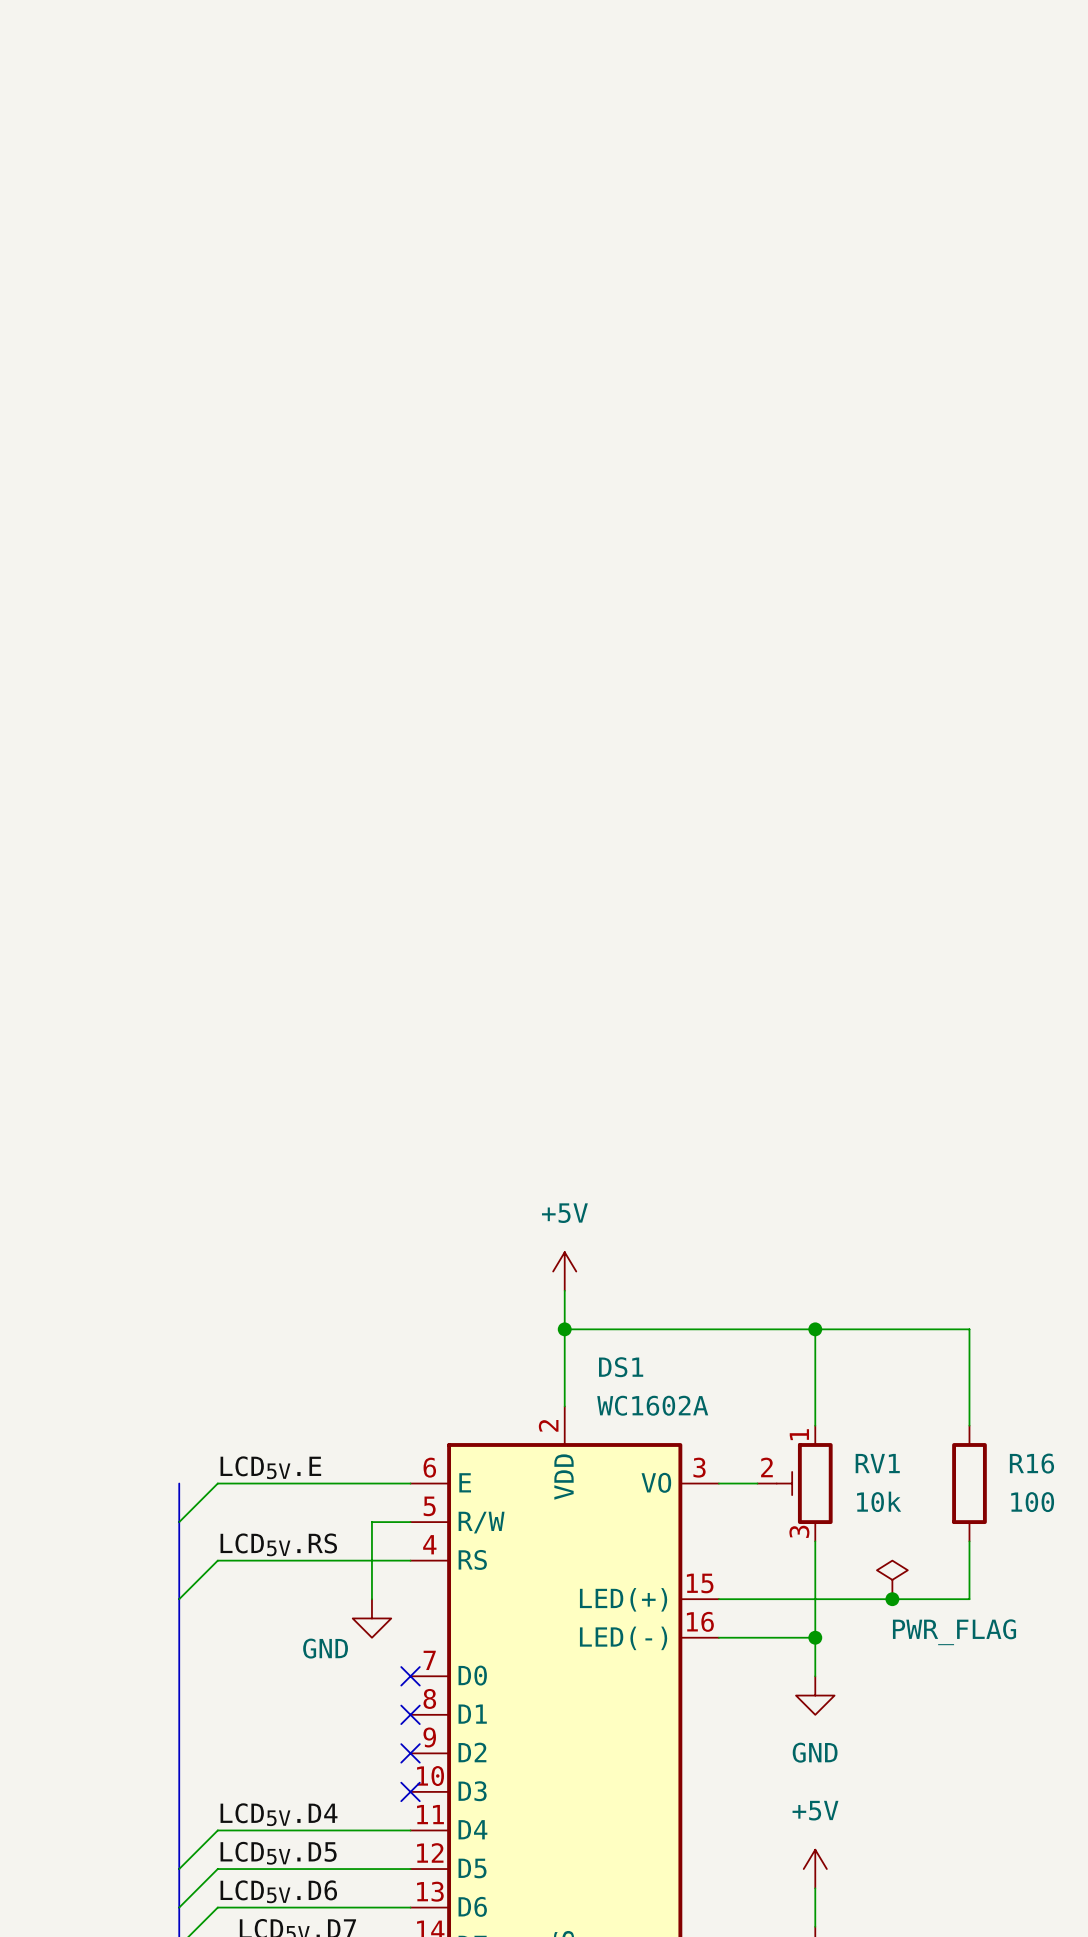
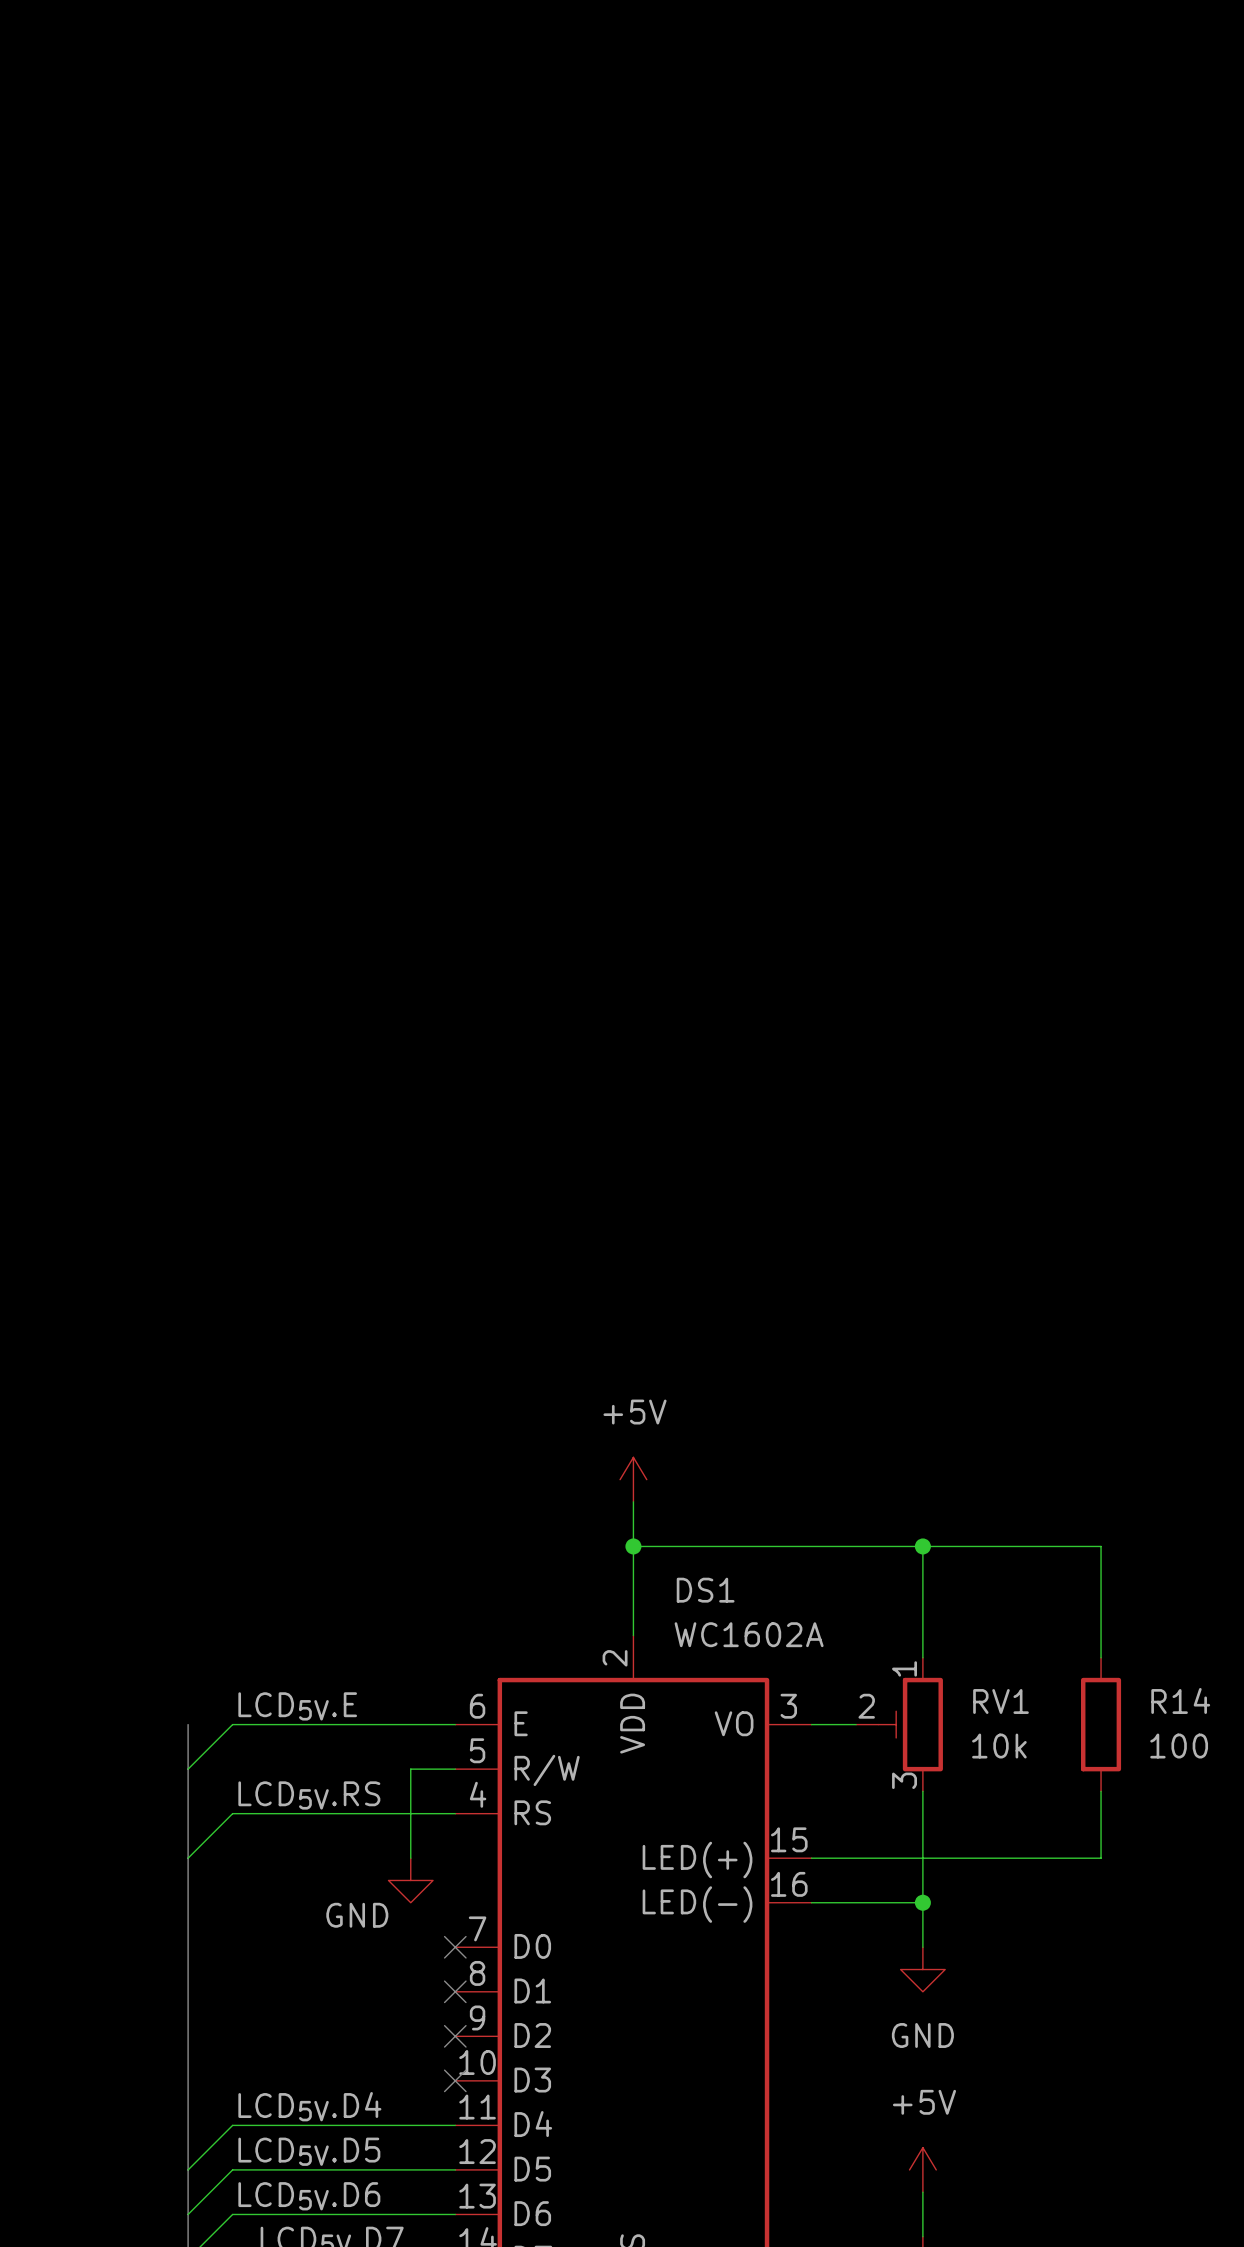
R16 name: R16 (1031, 1463) -> R14 (1180, 1700)
power symbol: PWR_FLAG (892, 1579) -> none
junction: (892, 1599) -> none

